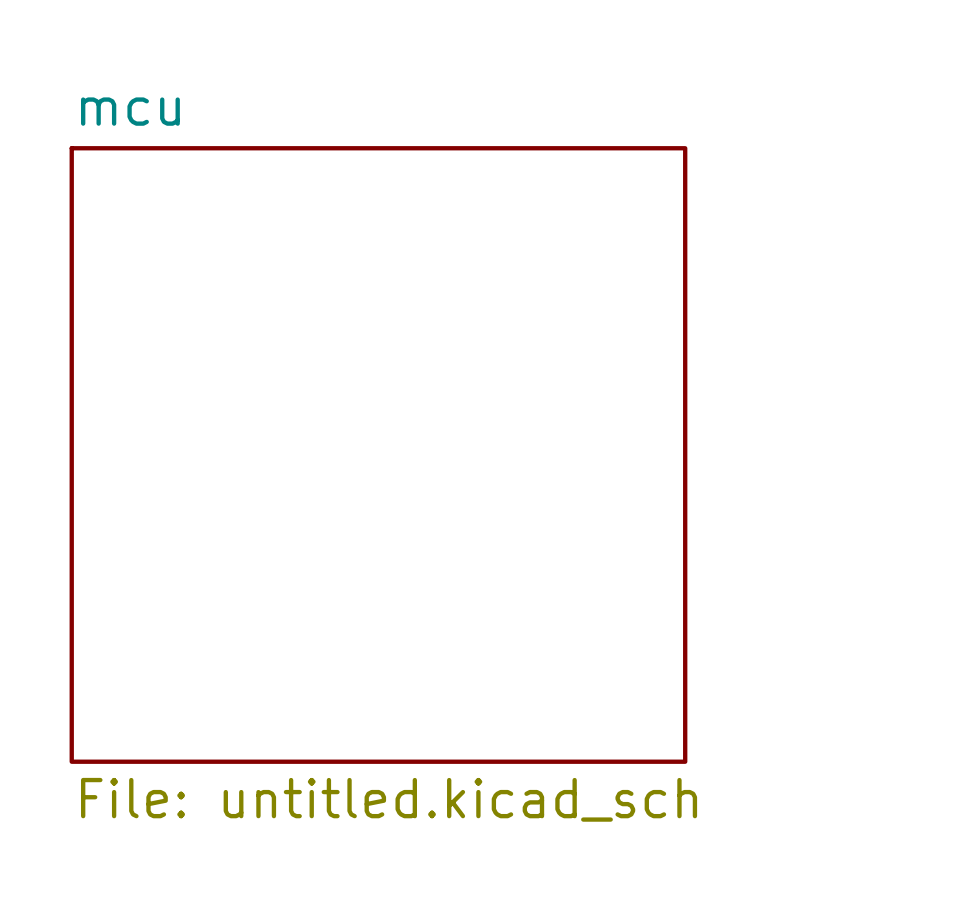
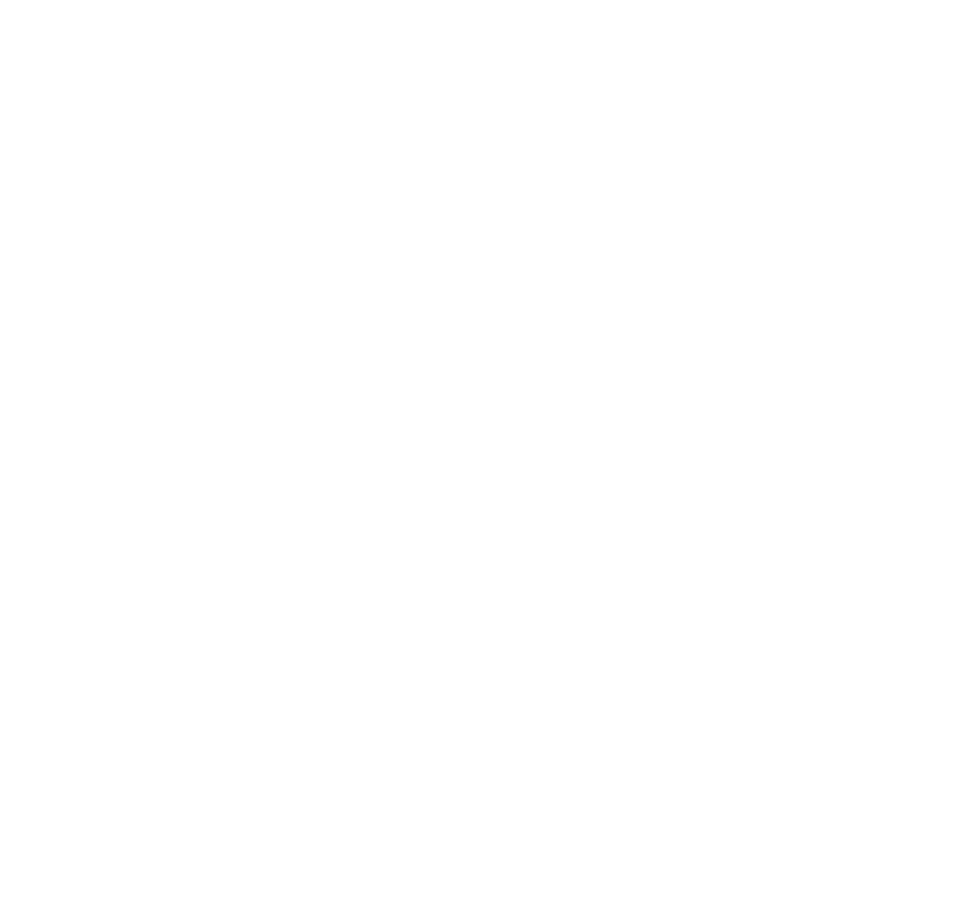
sheet mcu: File: untitled.kicad_sch (378, 454) -> none

